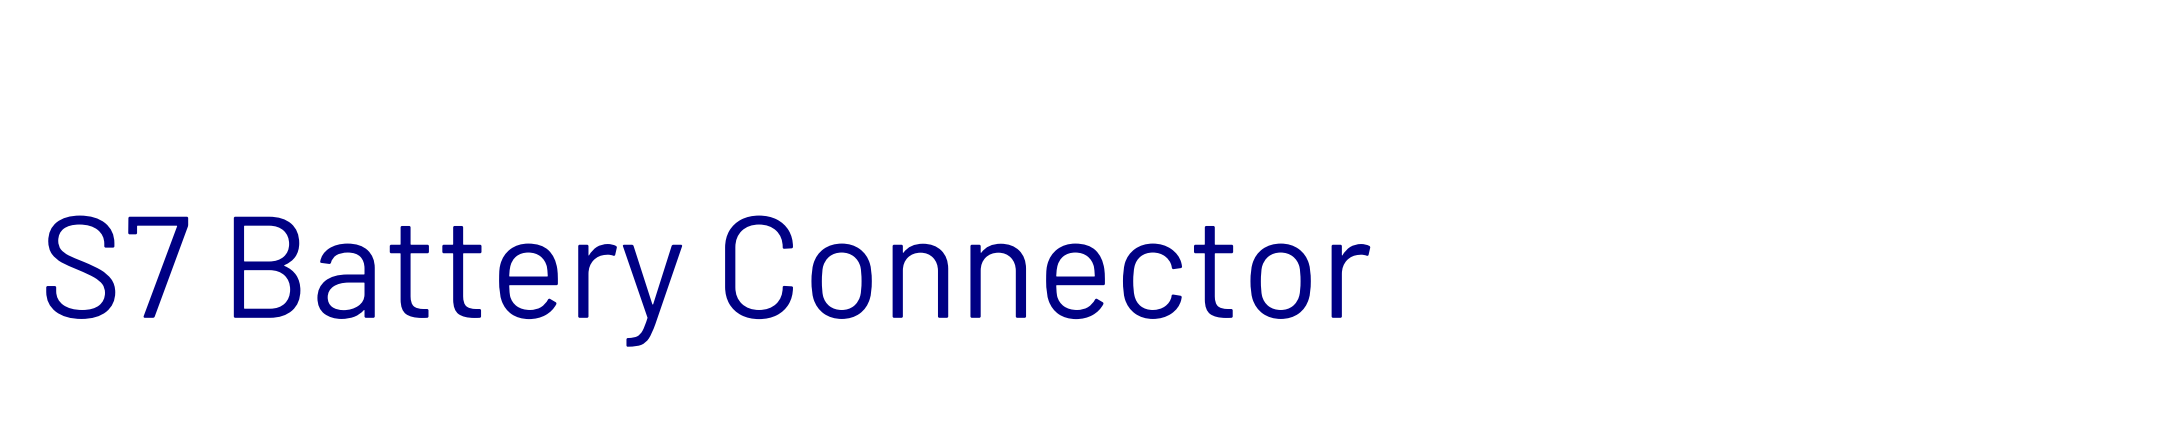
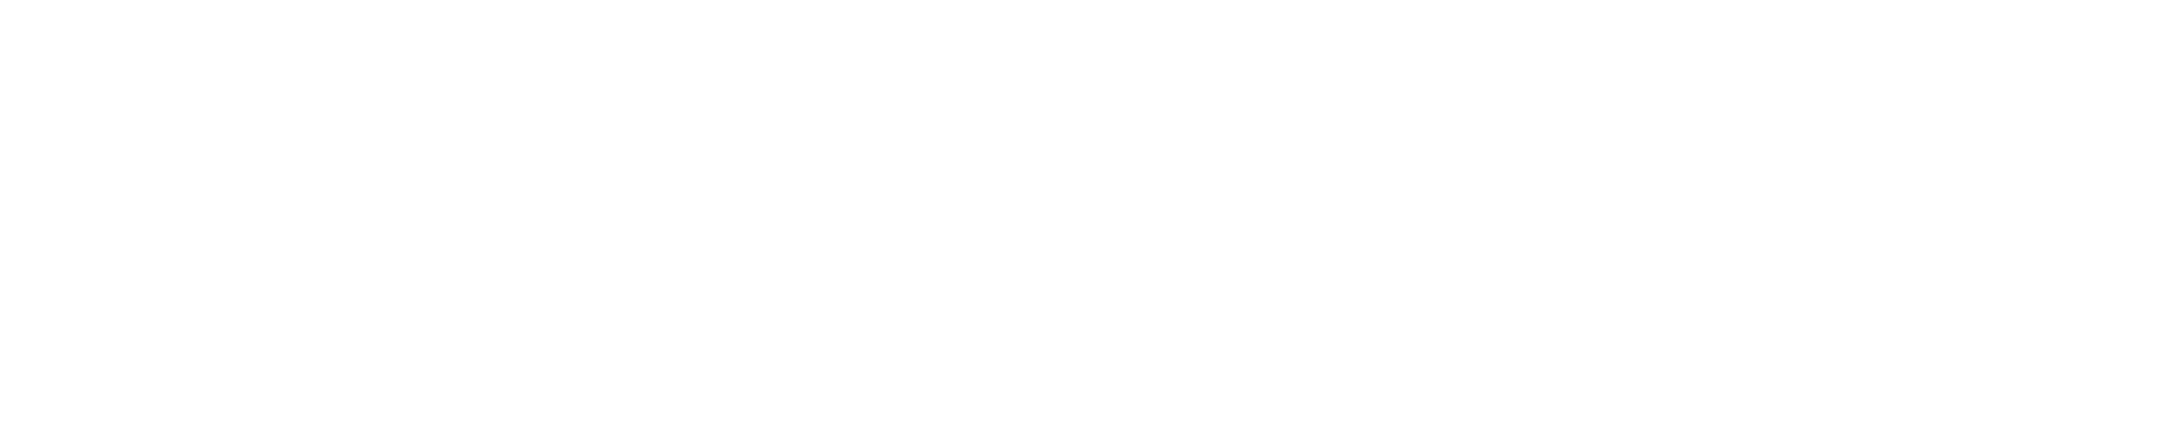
text: S7 Battery Connector (708, 281) -> none

